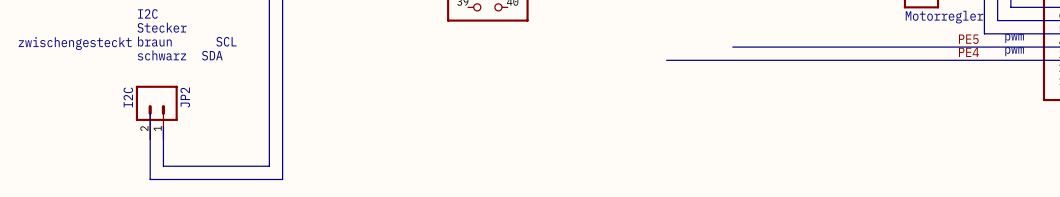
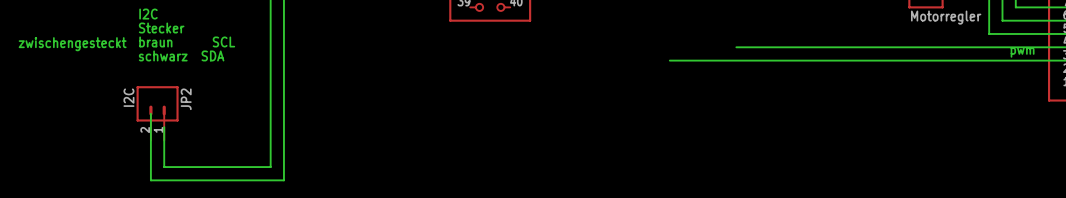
text: pwm (1014, 38) -> none
label: PE5 (968, 39) -> none
label: PE4 (968, 52) -> none

